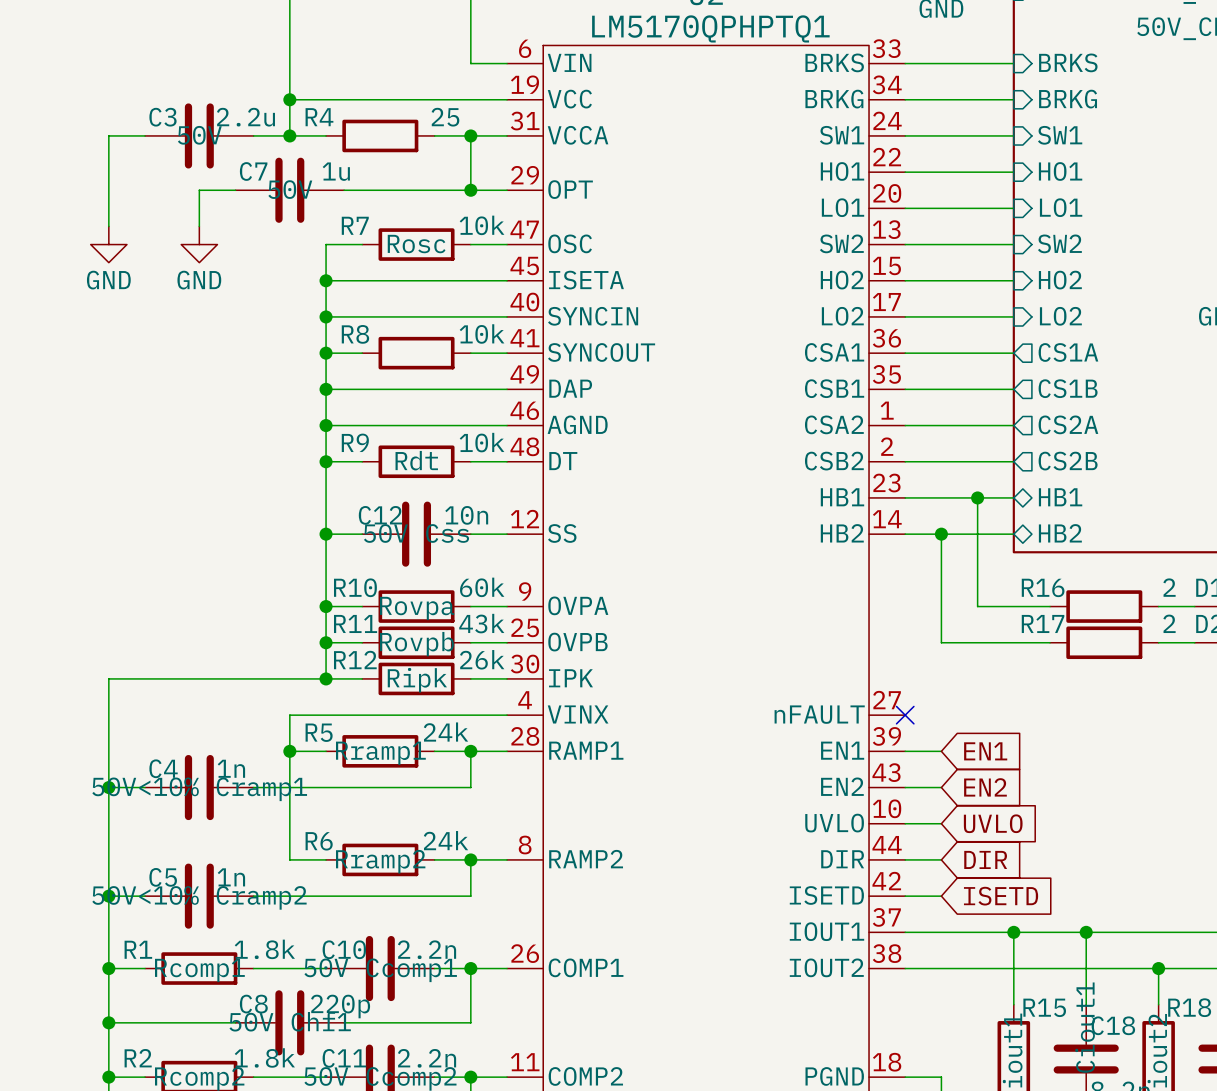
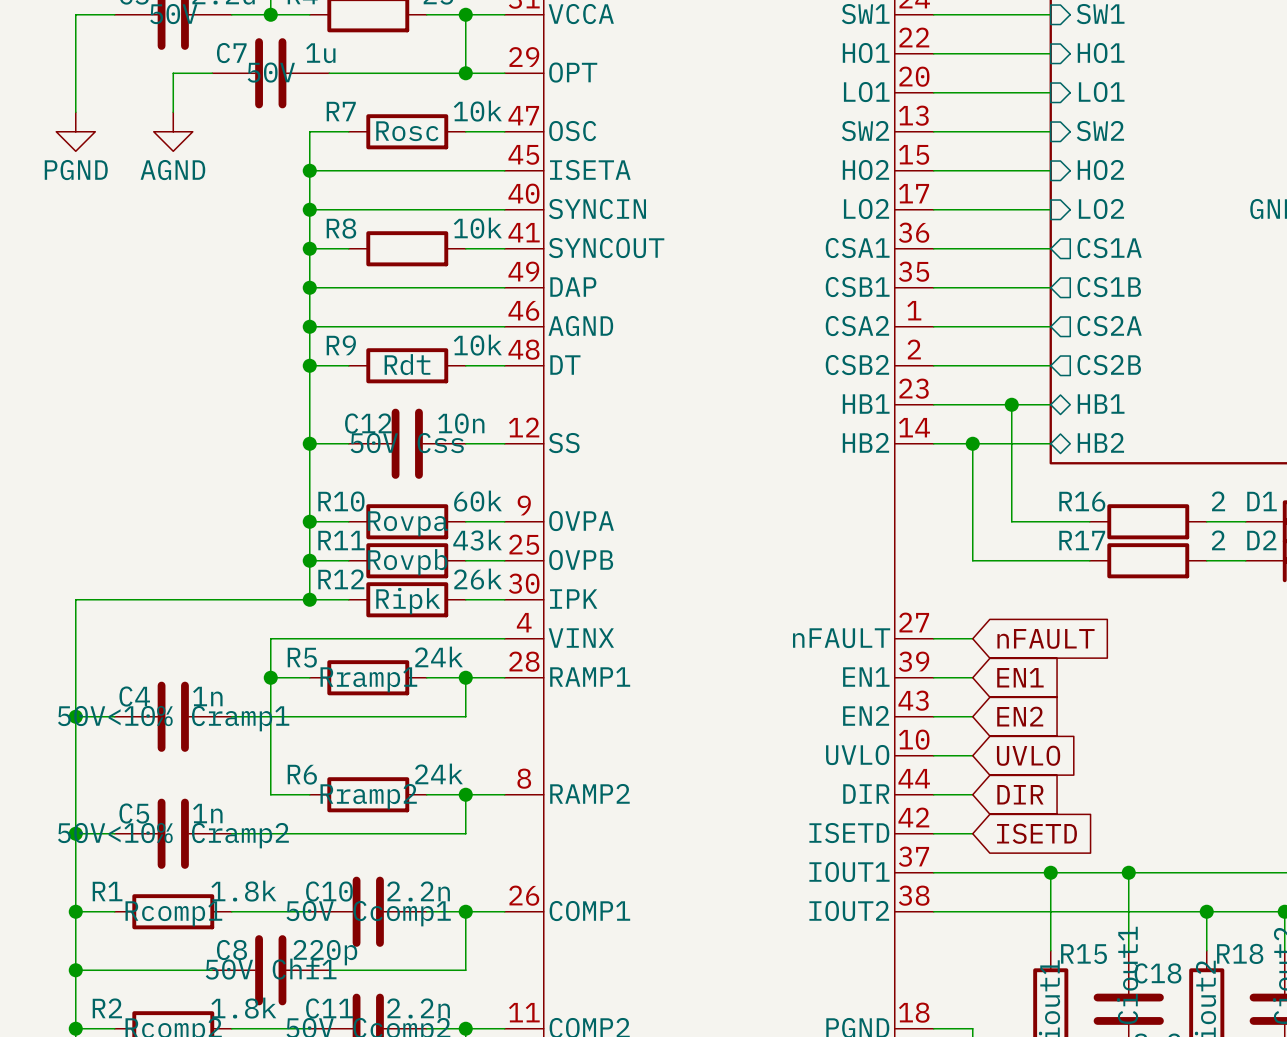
power symbol: GND (108, 244) -> PGND (75, 131)
power symbol: GND (199, 244) -> AGND (173, 131)
wire: none -> (933, 638) (972, 638)
no-connect mark: (905, 715) -> none
global label: none -> nFAULT (1046, 638)

